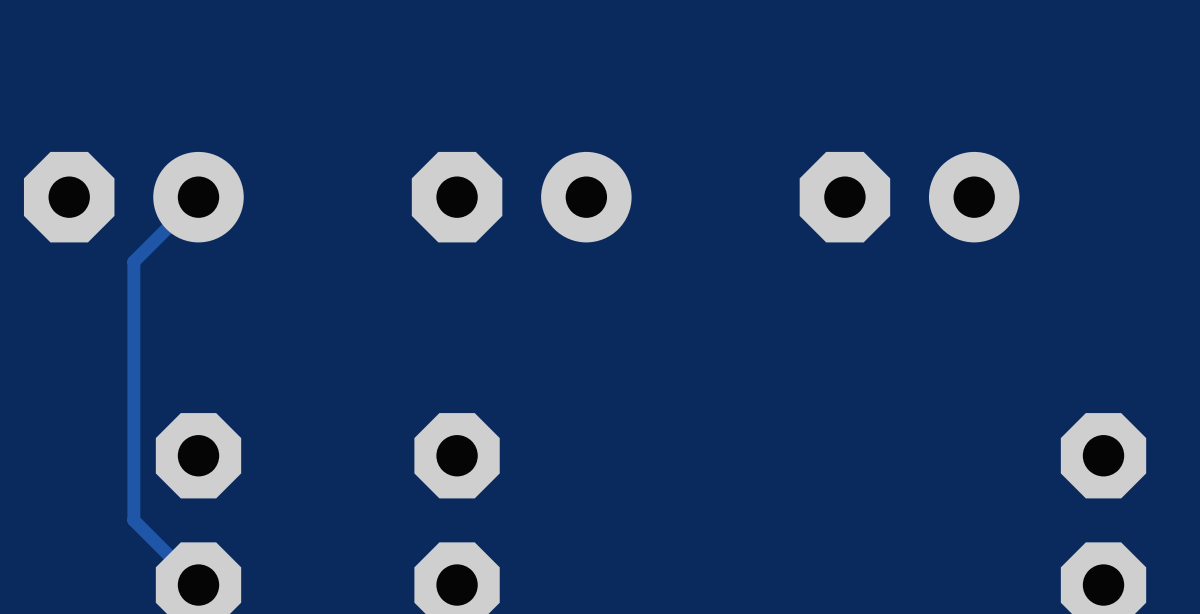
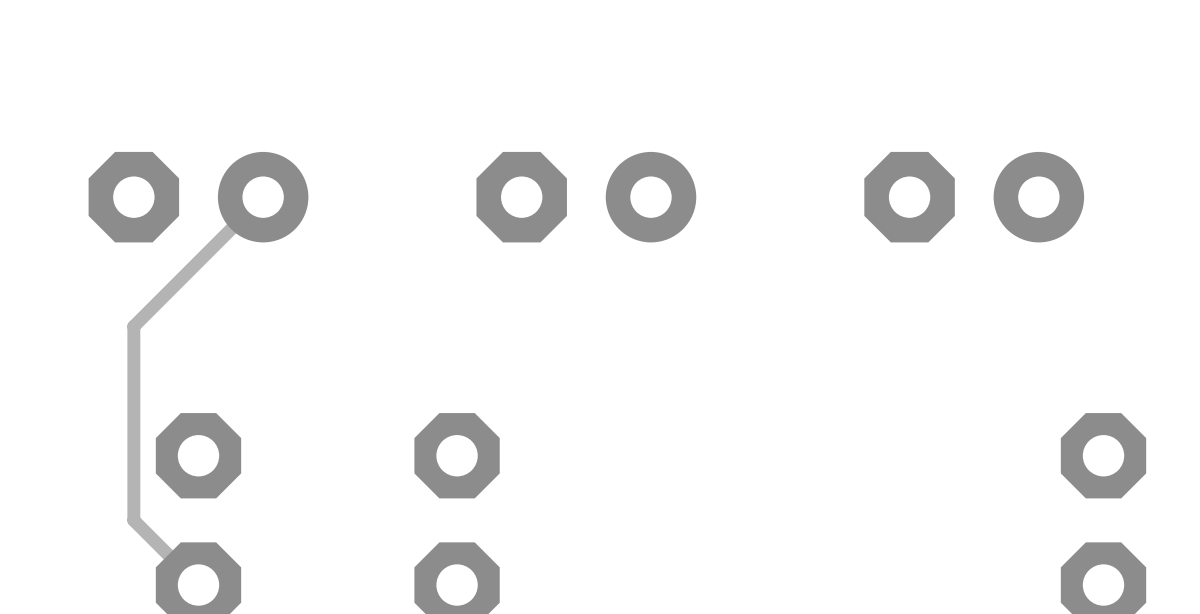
part position: (133, 197) -> (198, 197)
track: (198, 197) (133, 261) (133, 326) -> (263, 197) (133, 326)
part position: (521, 197) -> (586, 197)
part position: (909, 197) -> (974, 197)

